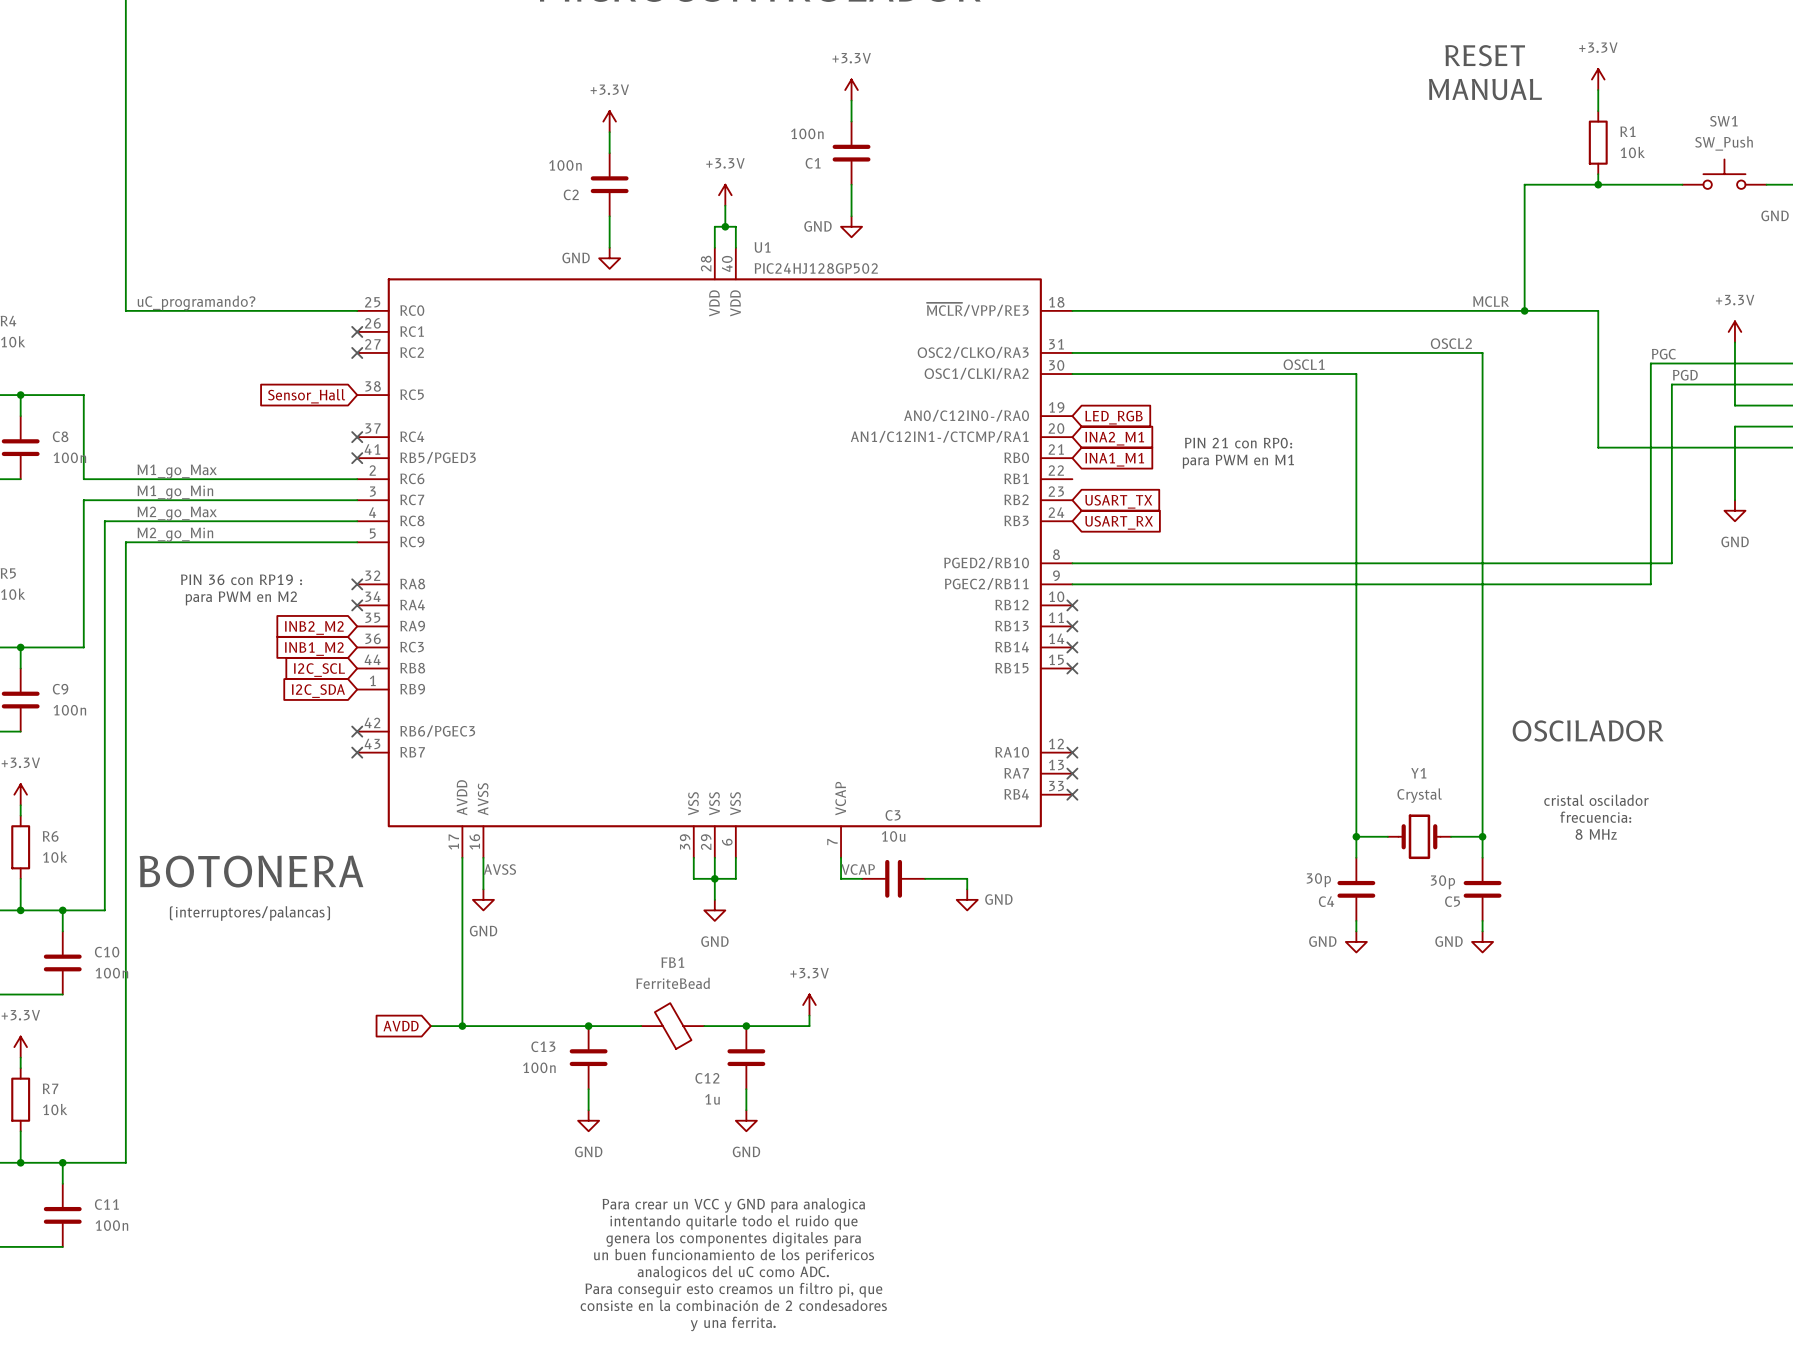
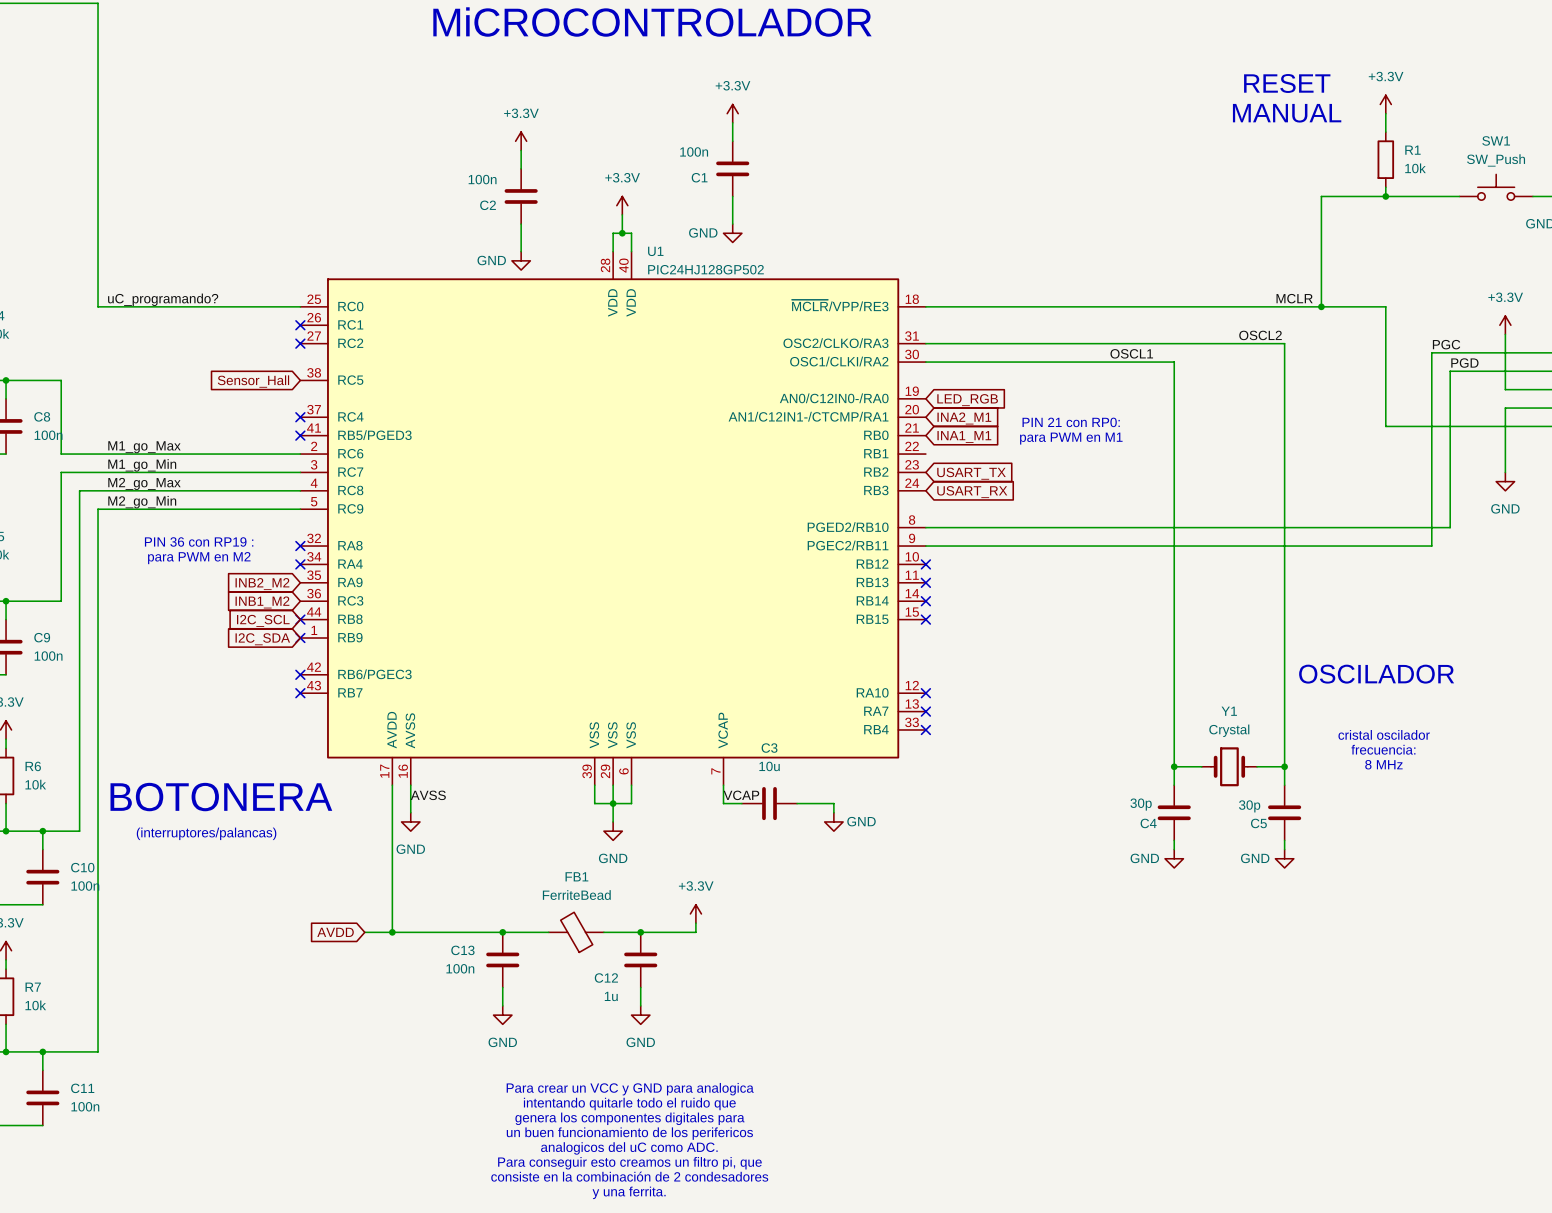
no-connect mark: none -> (300, 619)
no-connect mark: none -> (300, 638)

